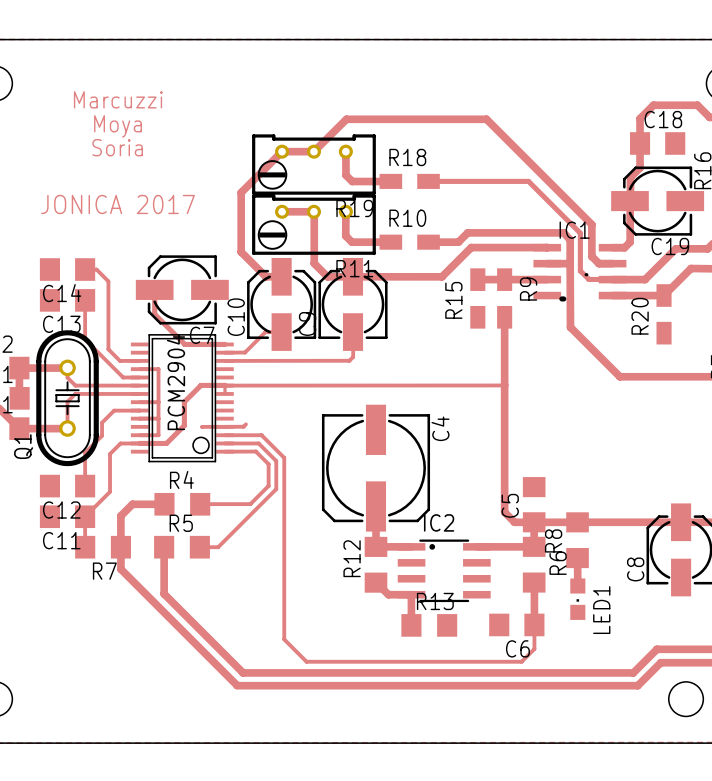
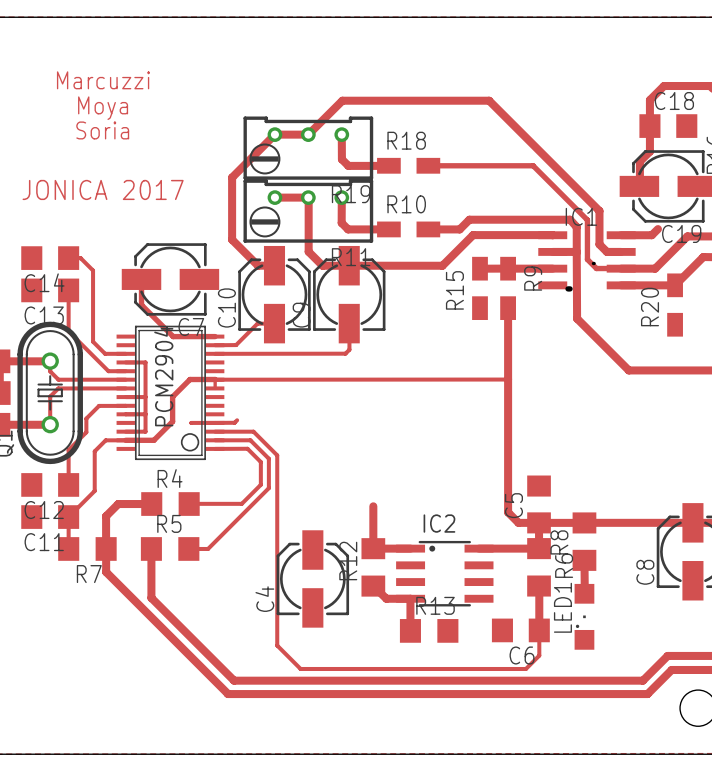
top track: (630, 200) (630, 242) (624, 247) -> (657, 229) (651, 235) (633, 235)
C4 footprint: [321, 404, 431, 532] -> [276, 530, 350, 628]
C4 name position: C4 (440, 428) -> C4 (264, 599)
LED1 footprint: [570, 578, 586, 620] -> [574, 583, 595, 650]
LED1 name position: LED1 (601, 610) -> LED1 (562, 607)

